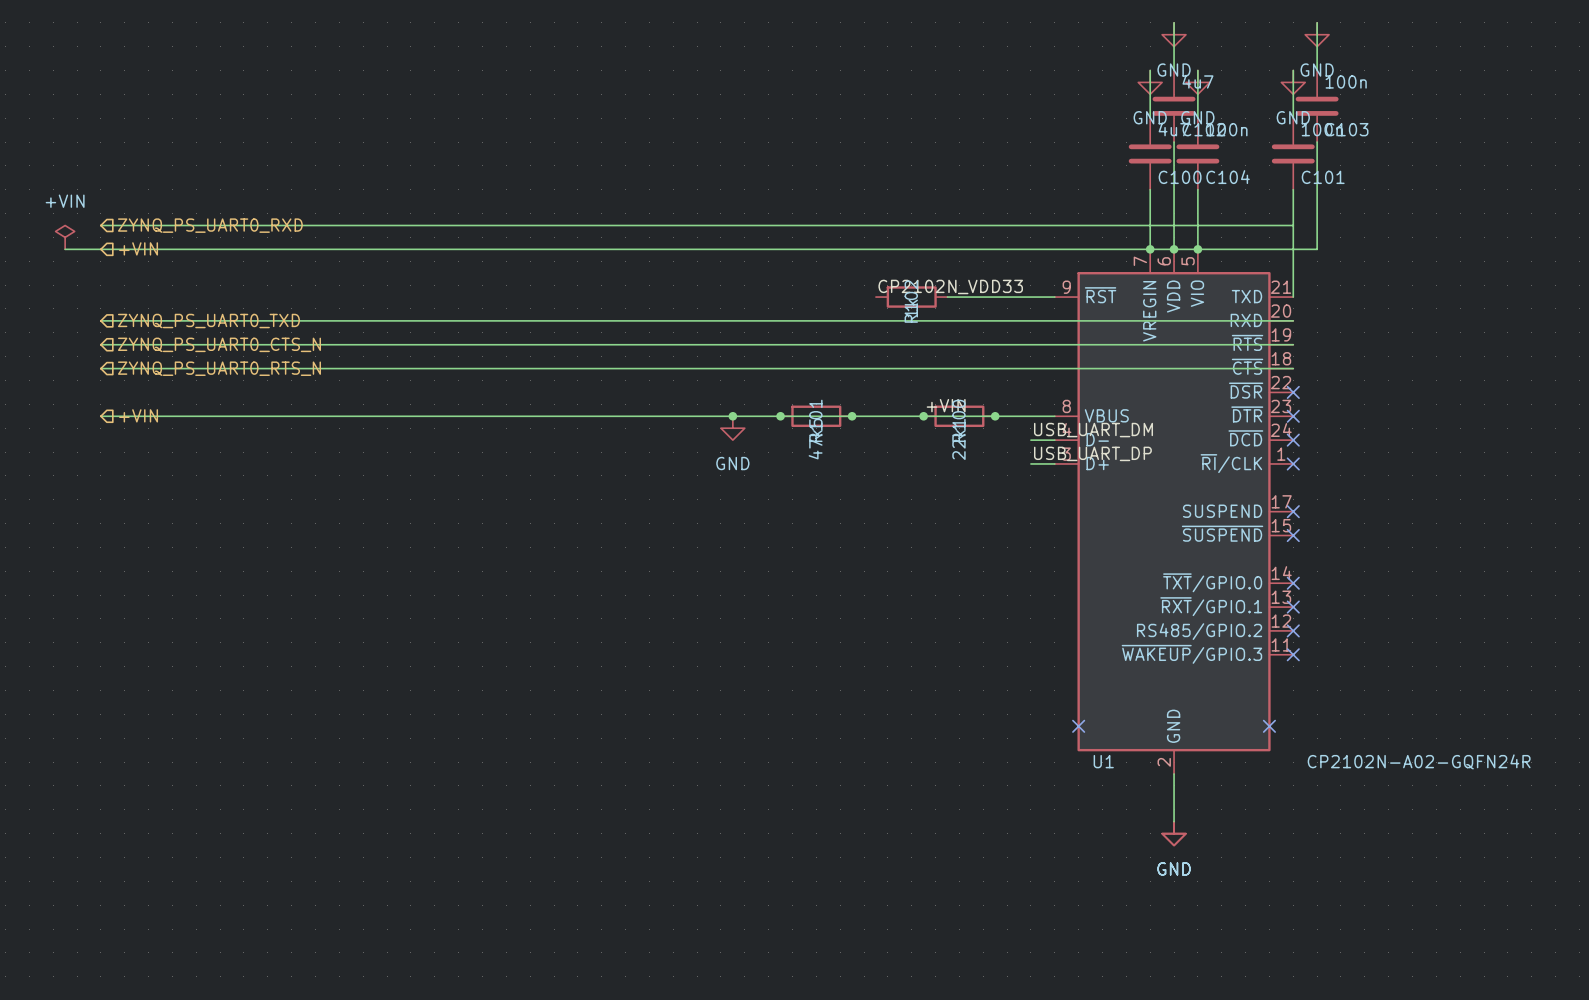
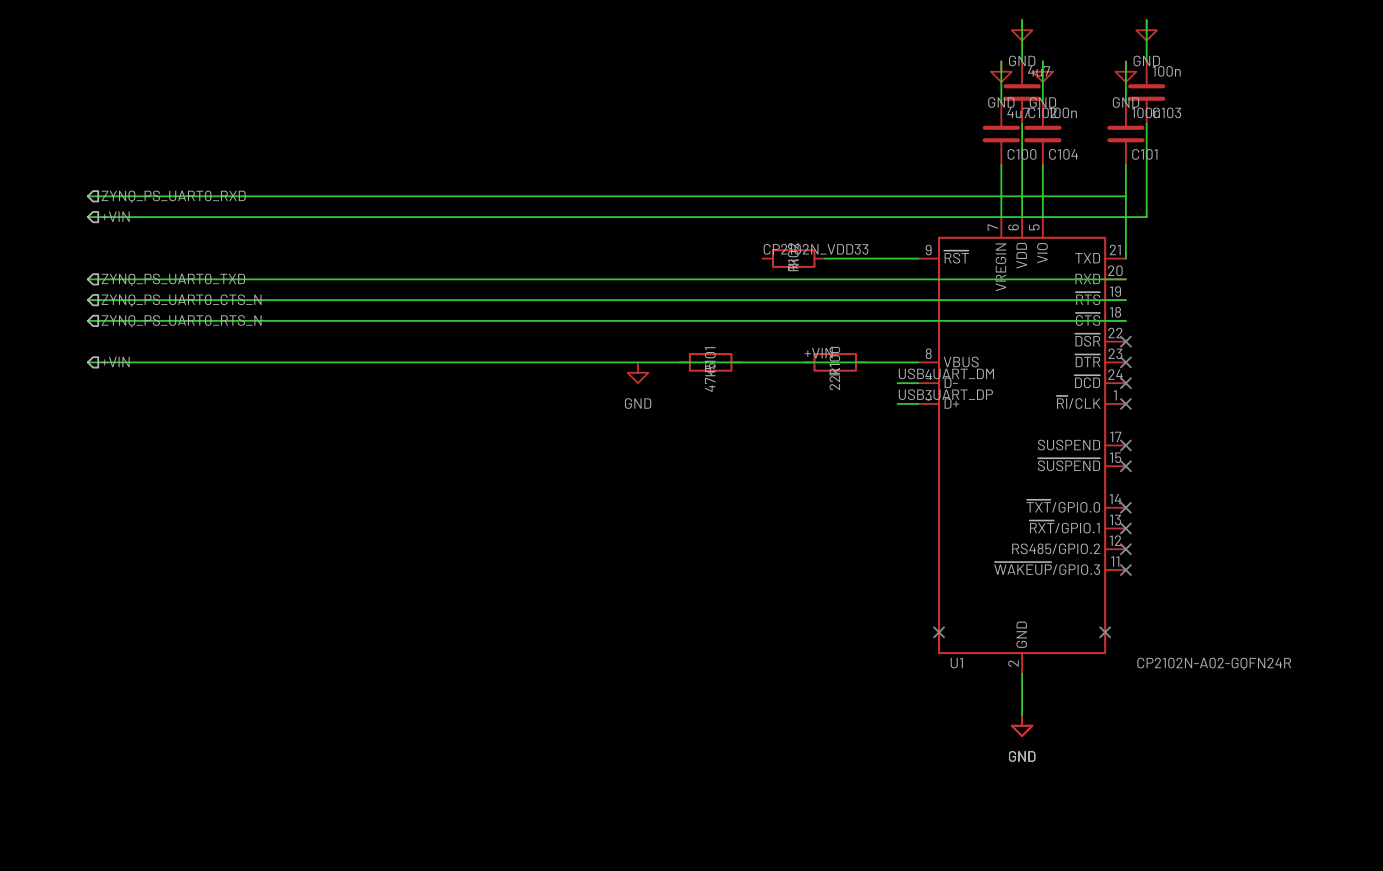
power symbol: +VIN (65, 237) -> none
wire: (65, 249) (100, 249) -> none
junction: (1150, 249) -> none
junction: (1174, 249) -> none
junction: (1197, 249) -> none
junction: (732, 416) -> none
junction: (780, 416) -> none
junction: (852, 416) -> none
junction: (923, 416) -> none
junction: (995, 416) -> none

